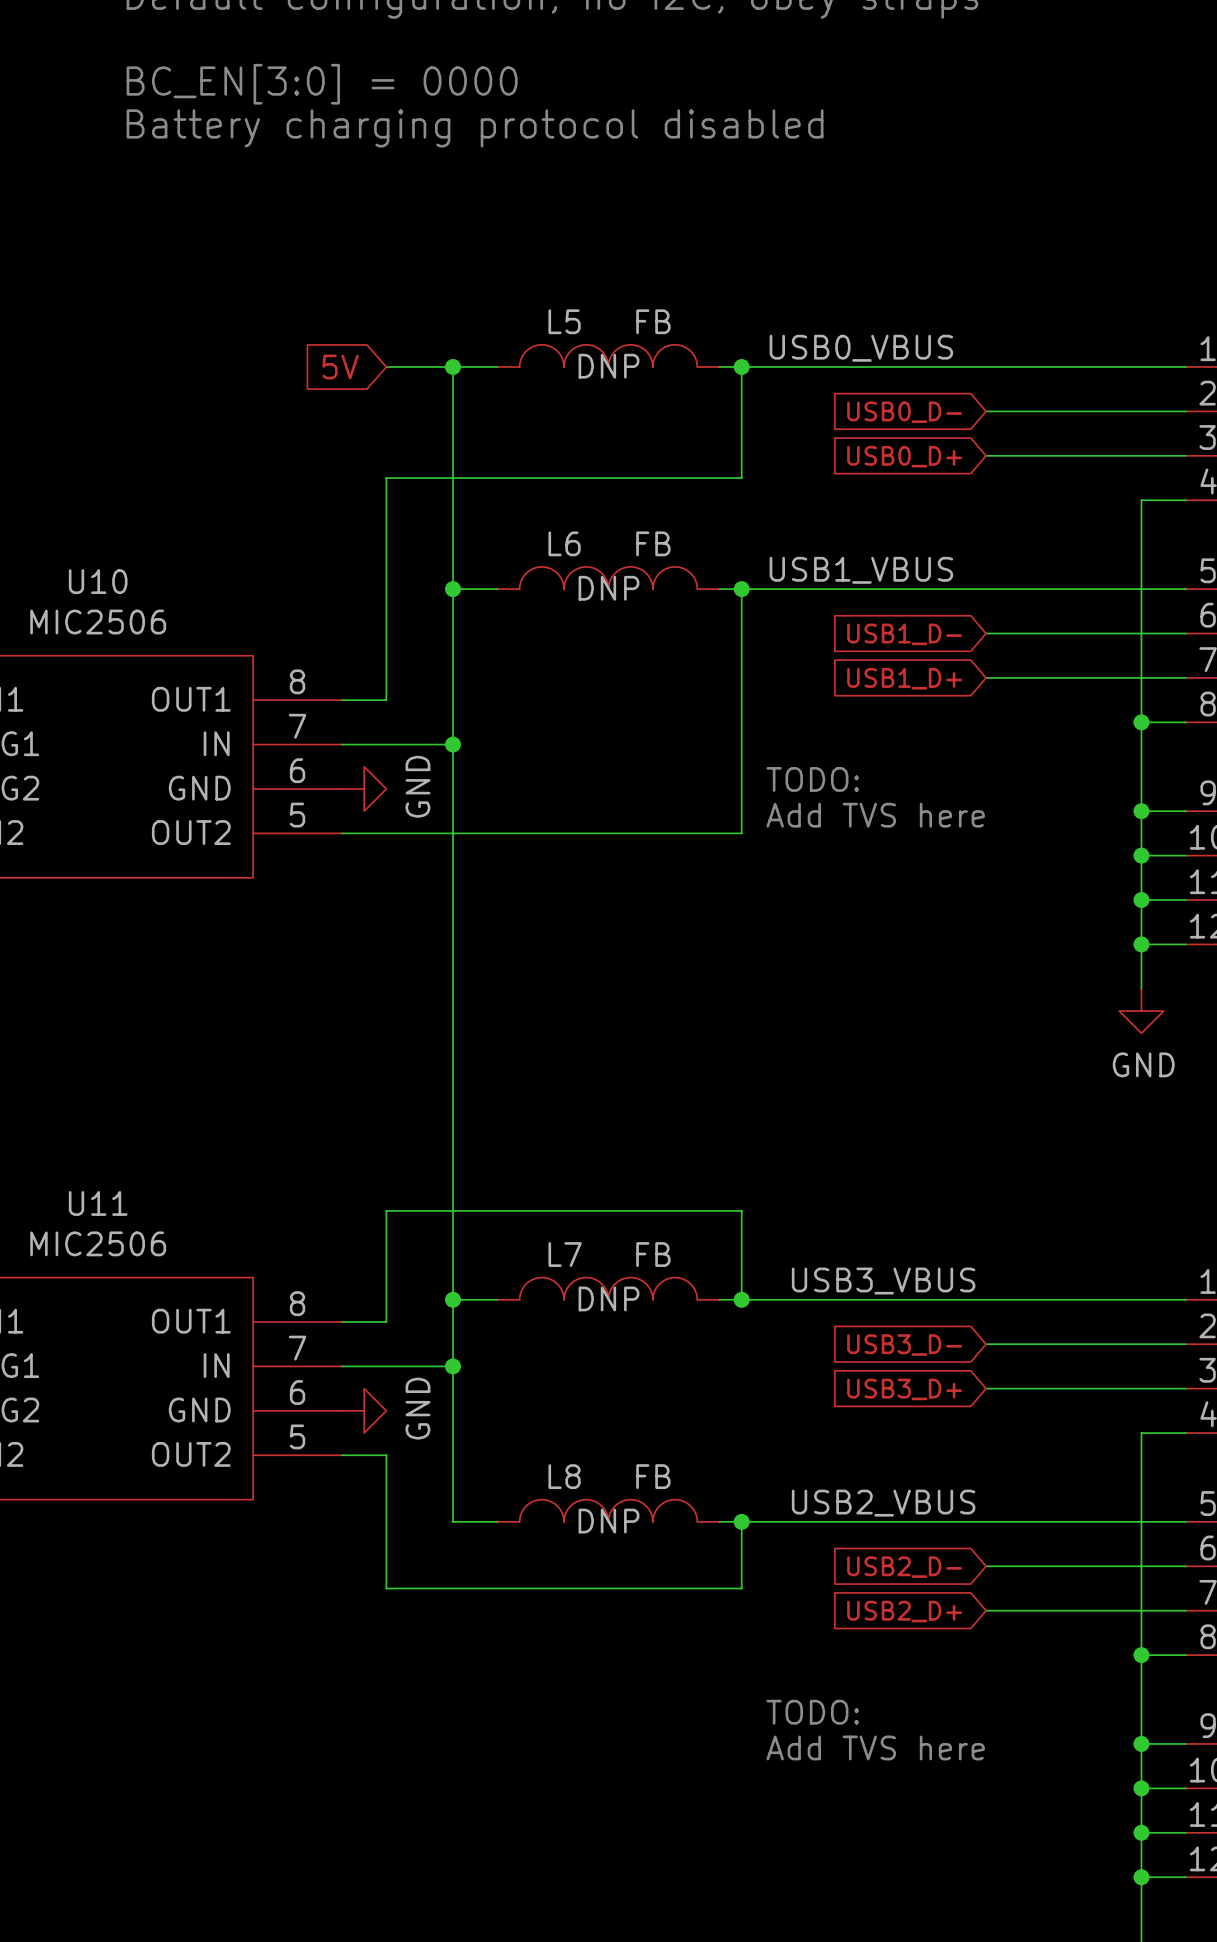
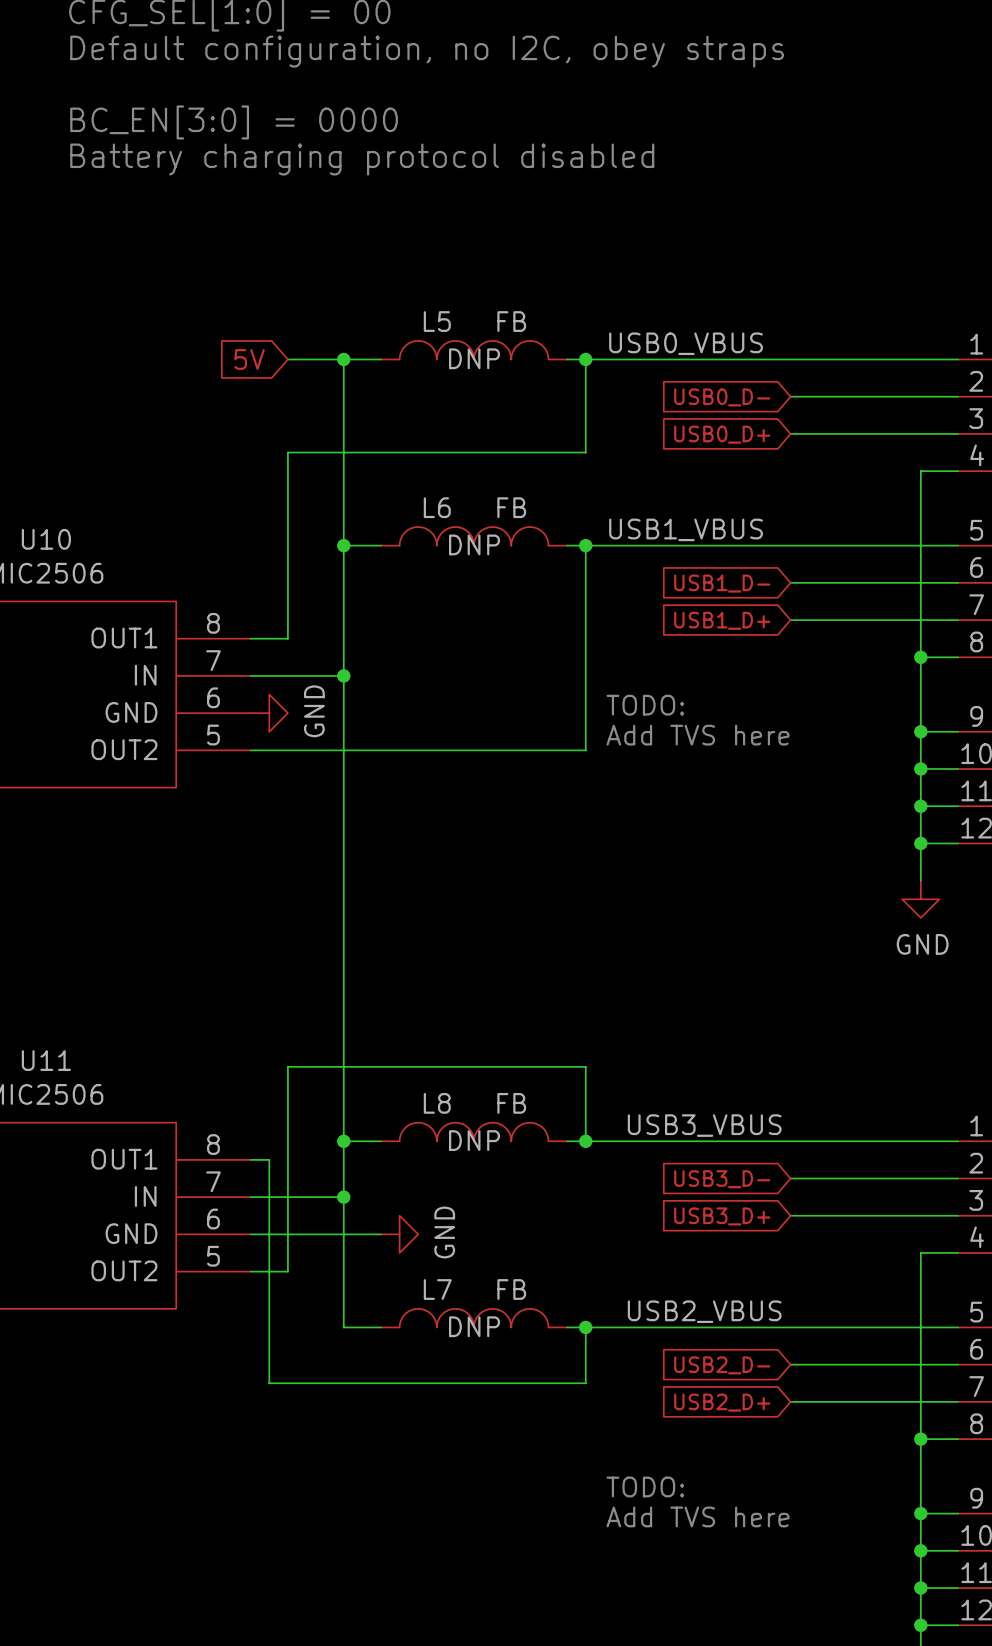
L7 name: L7 (565, 1254) -> L8 (437, 1103)
wire: (364, 1321) (386, 1321) -> (287, 1271) (287, 1159)
wire: none -> (250, 1234) (380, 1234)
power symbol position: GND (364, 1410) -> GND (399, 1234)
wire: (386, 1455) (386, 1588) -> (269, 1159) (269, 1383) (287, 1383)
L8 name: L8 (564, 1476) -> L7 (437, 1289)

